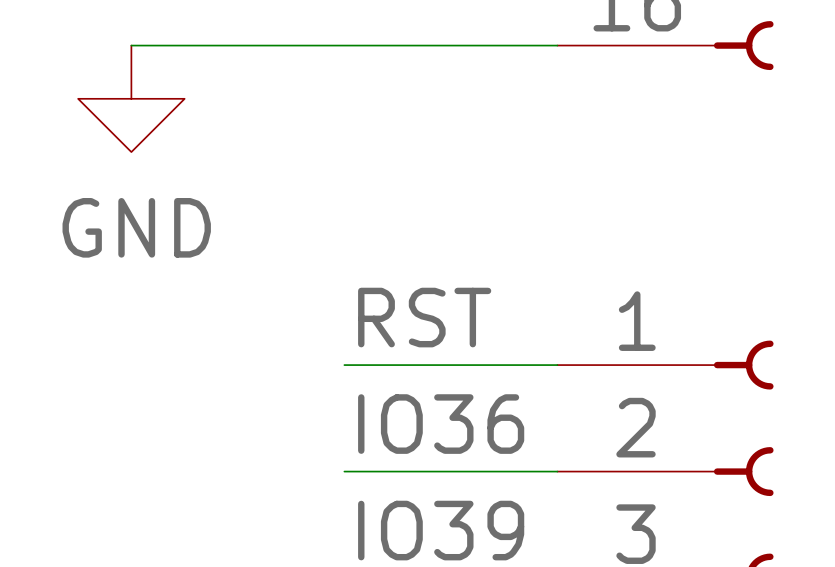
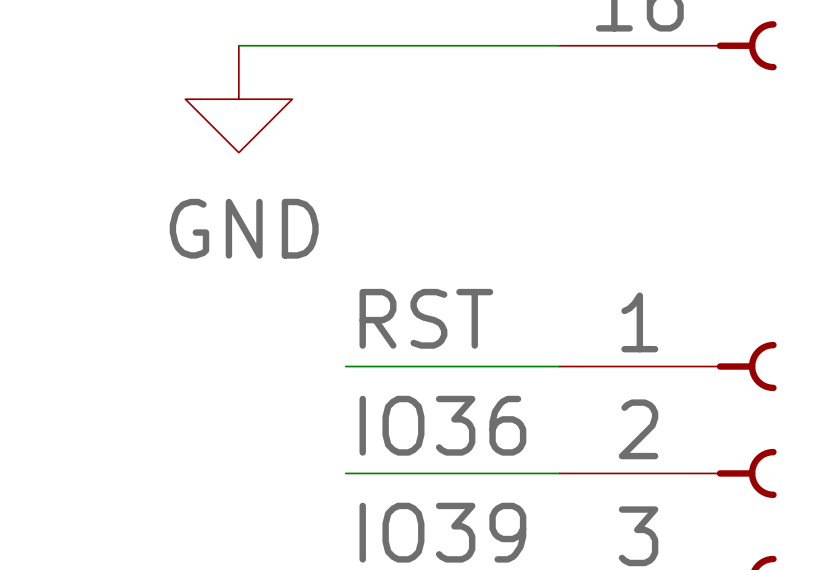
wire: (131, 45) (237, 45) -> none
power symbol position: GND (131, 98) -> GND (238, 99)

